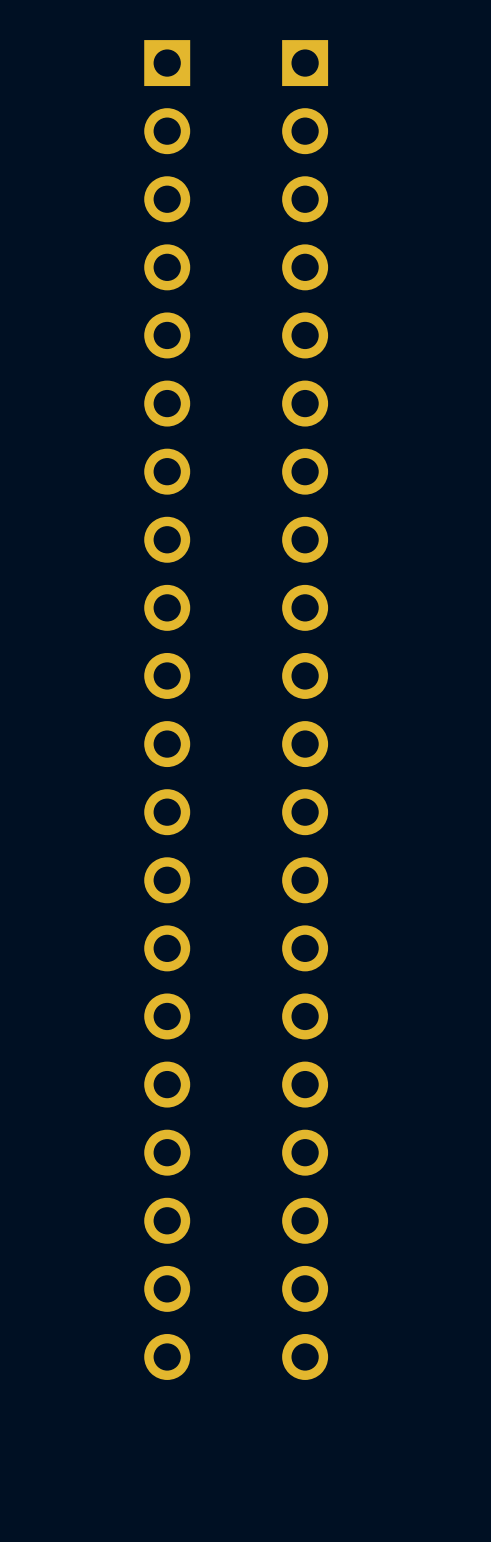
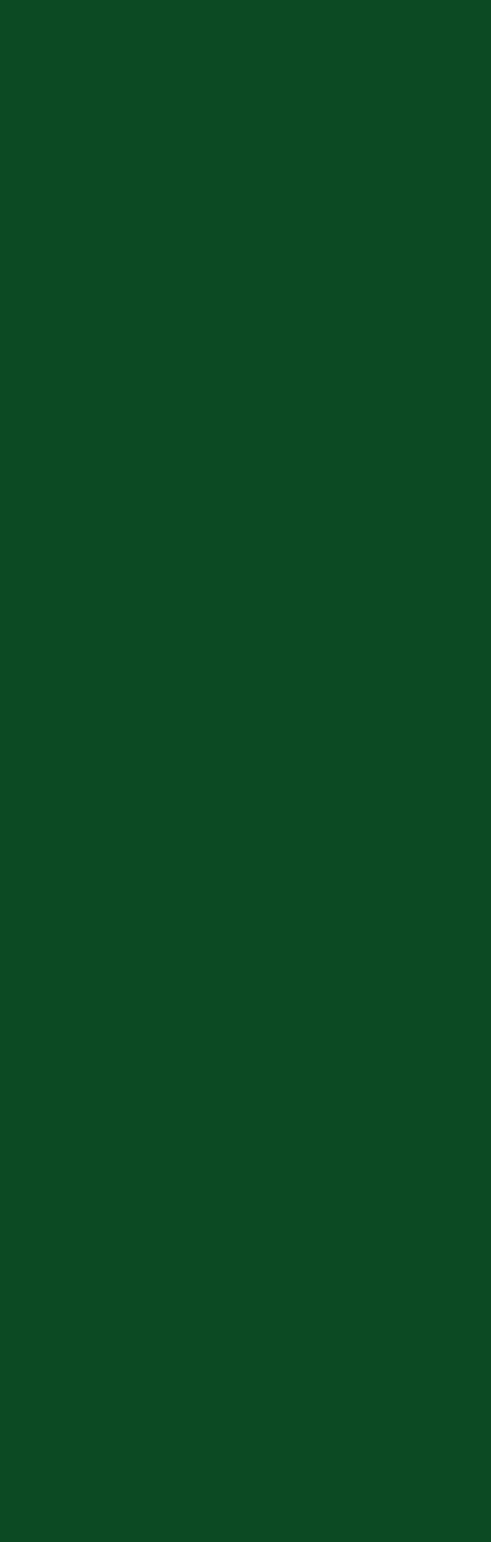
part: (167, 710) -> none
part: (305, 710) -> none

